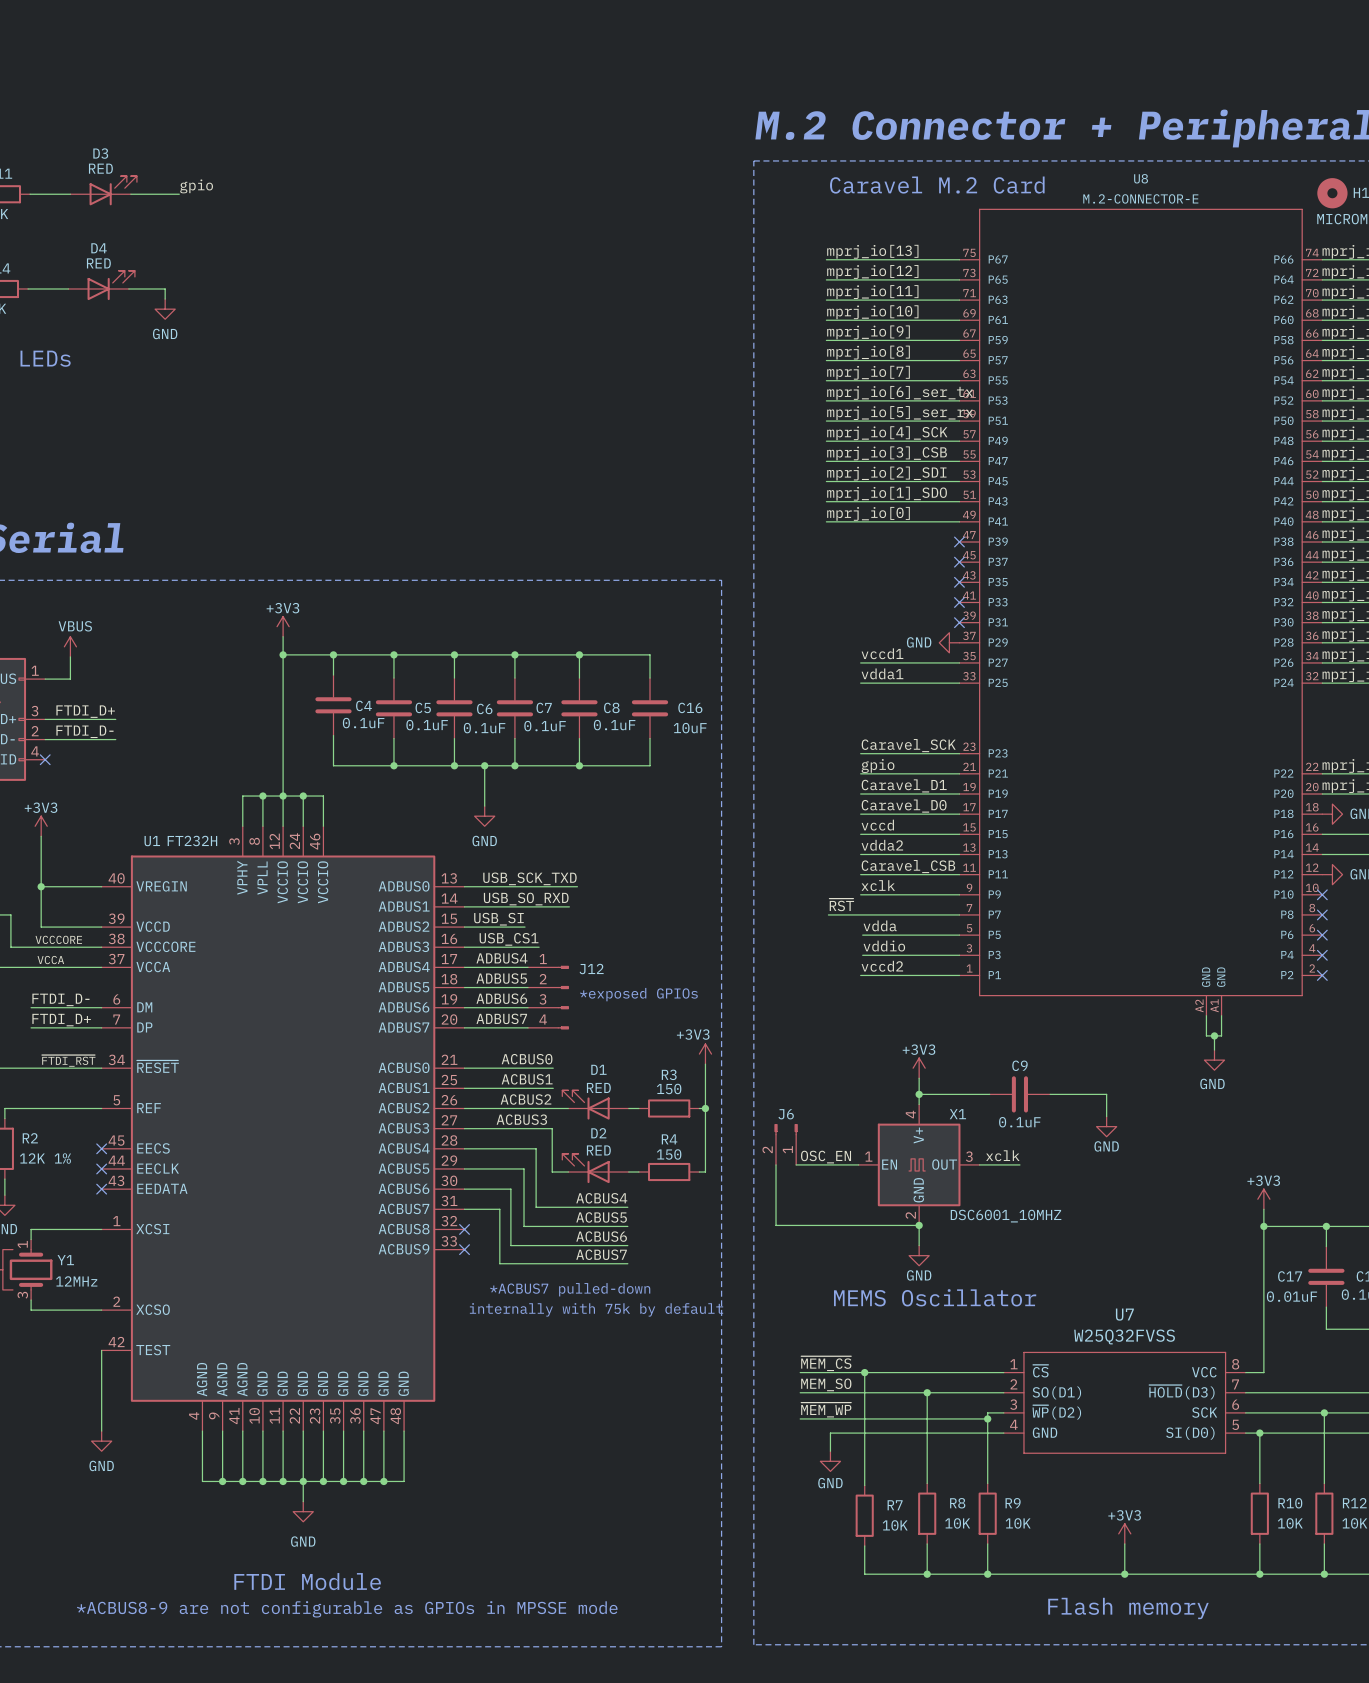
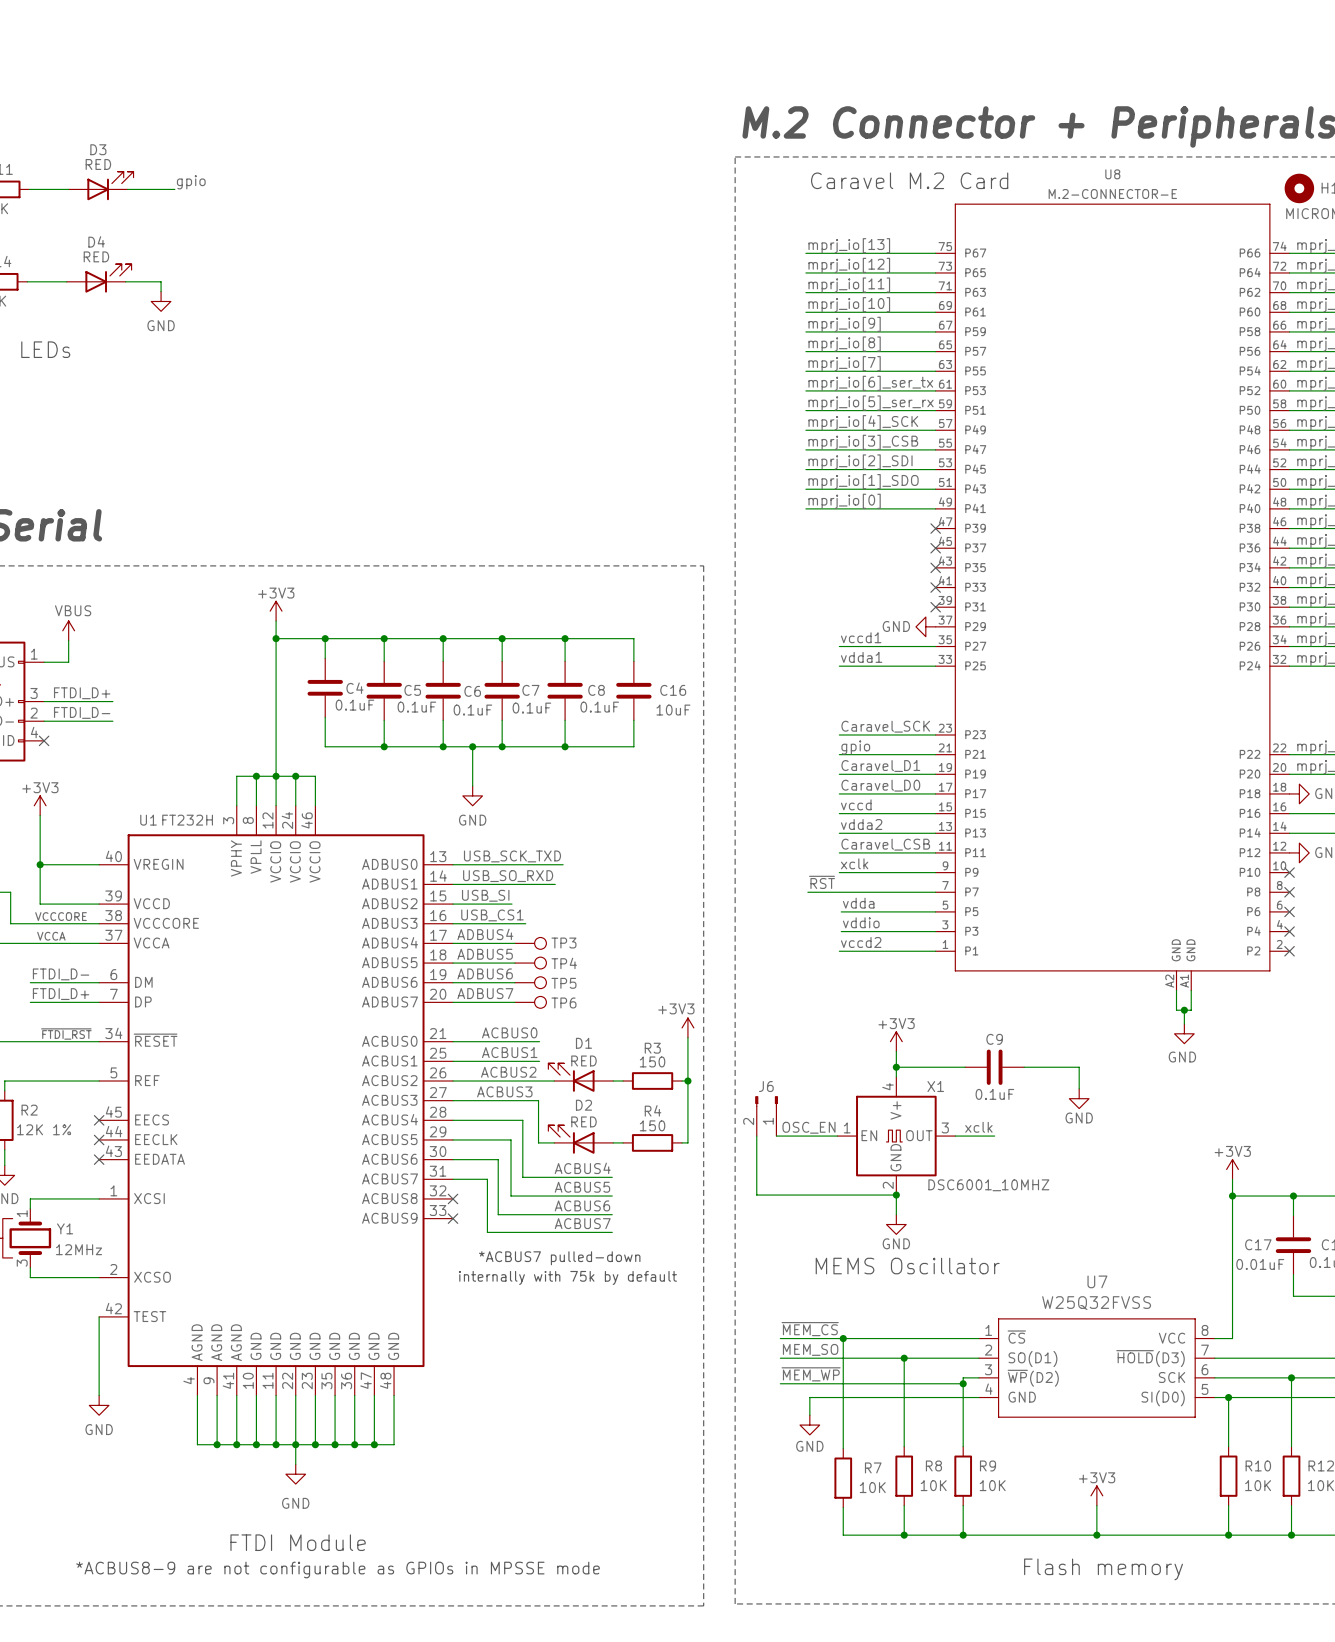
TP3: none -> (530, 943)
TP4: none -> (530, 963)
text: *exposed GPIOs (638, 994) -> none
J12: (548, 997) -> none
TP5: none -> (530, 982)
TP6: none -> (530, 1002)

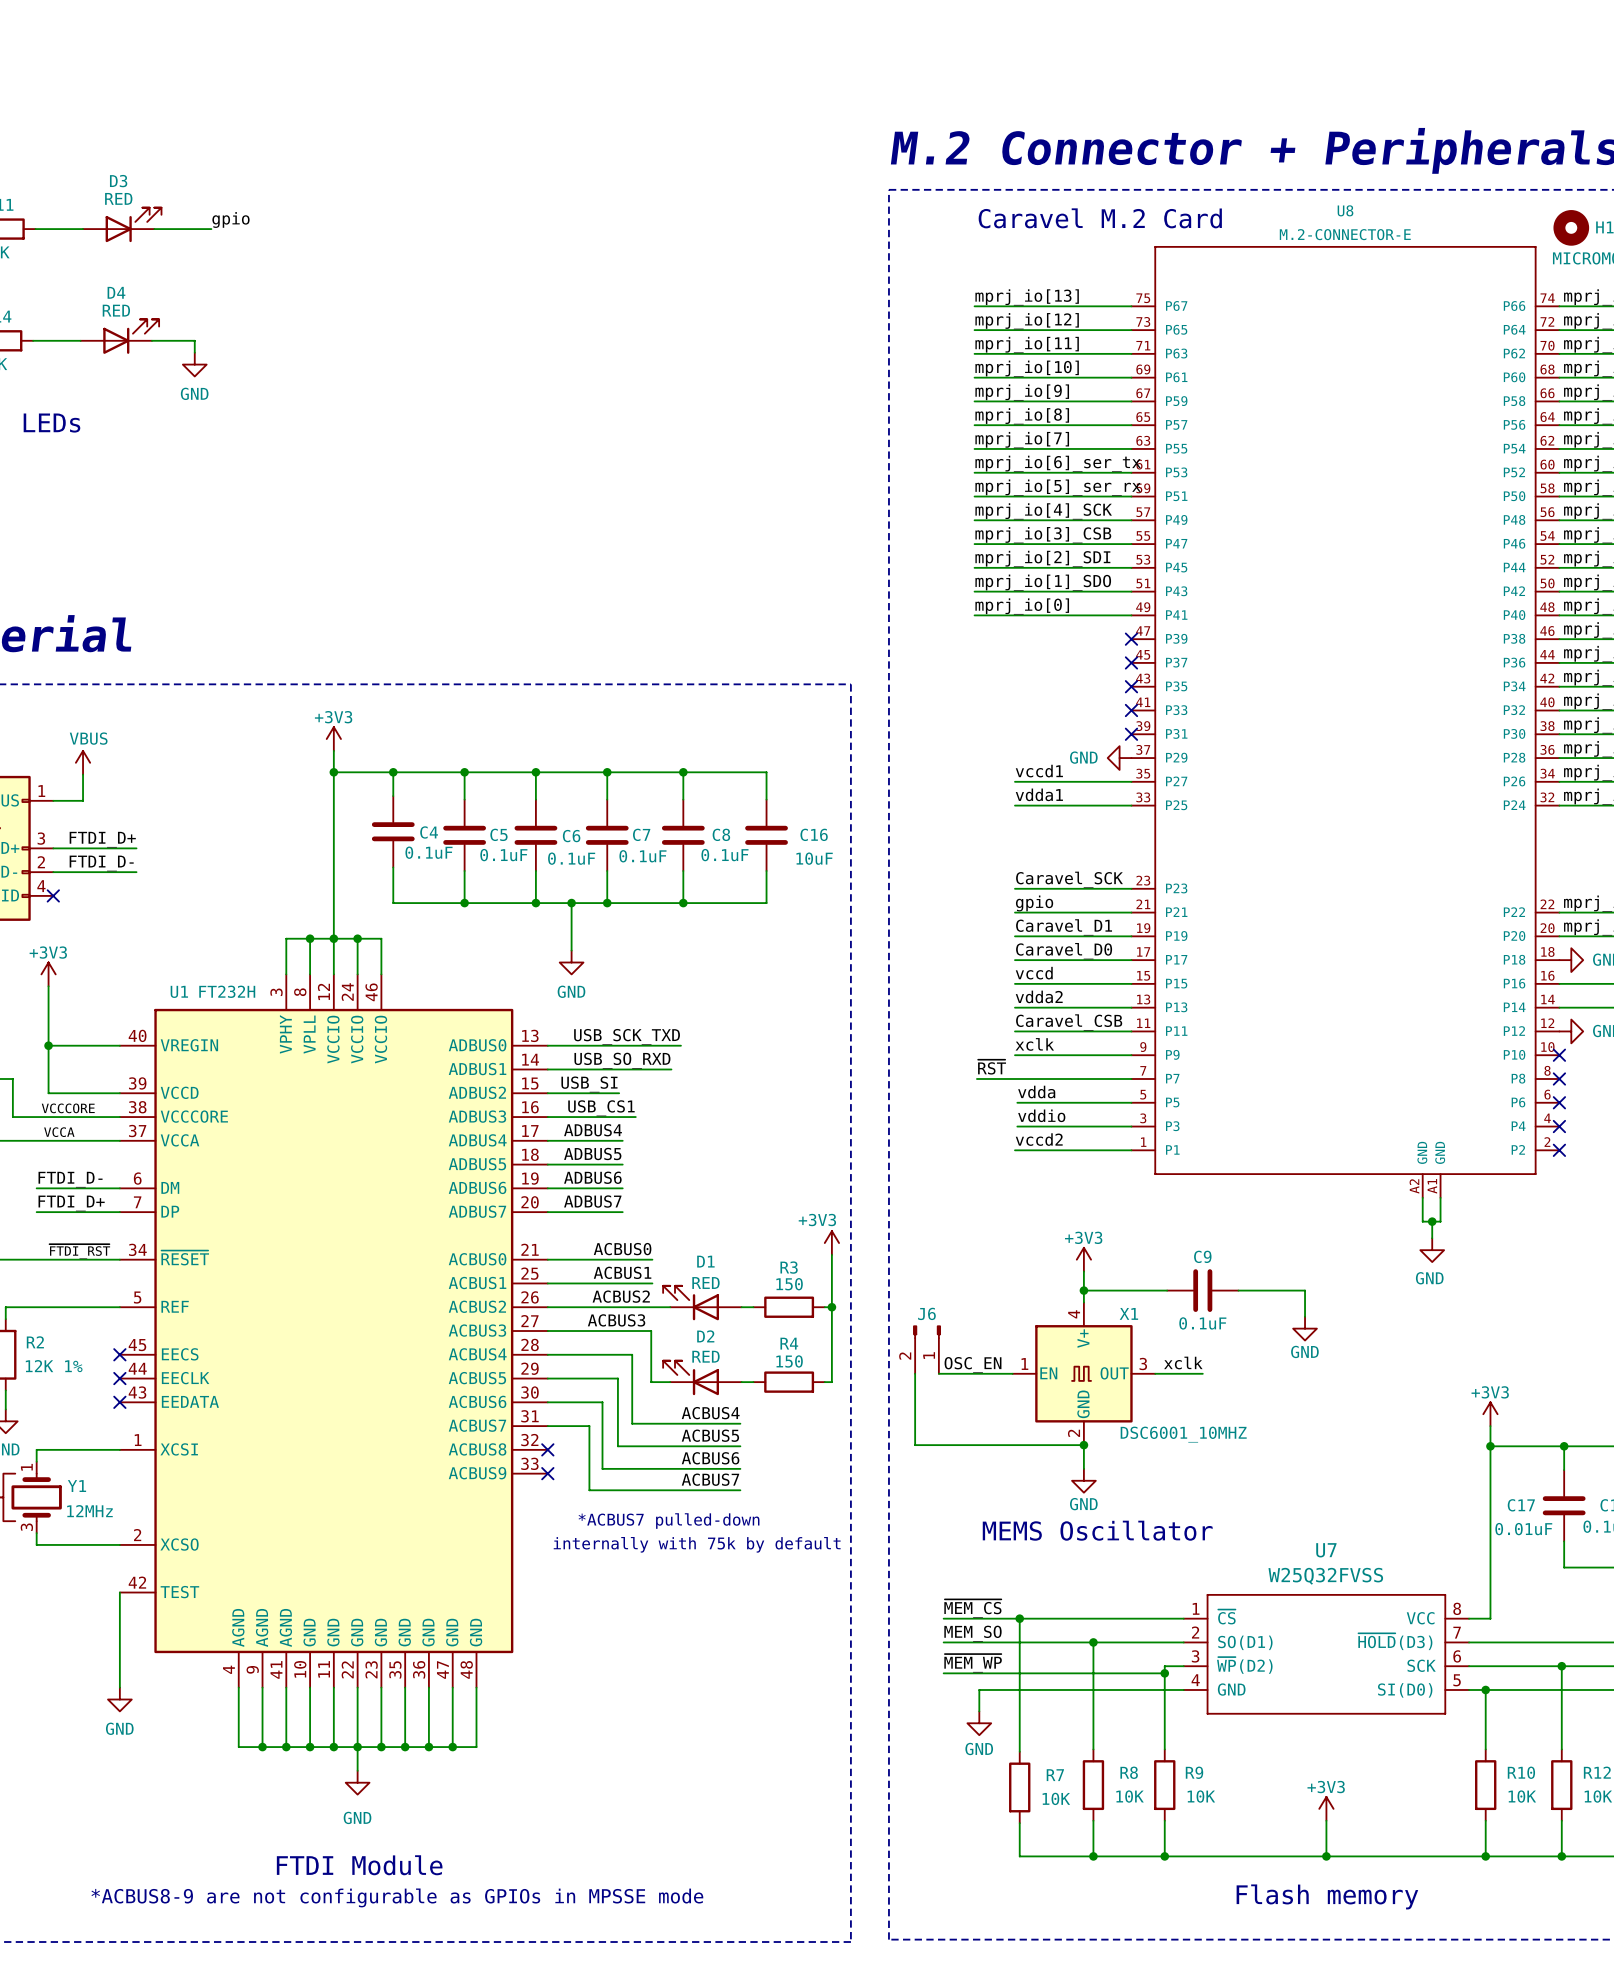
TP3: (530, 943) -> none
TP4: (530, 963) -> none
TP5: (530, 982) -> none
TP6: (530, 1002) -> none

